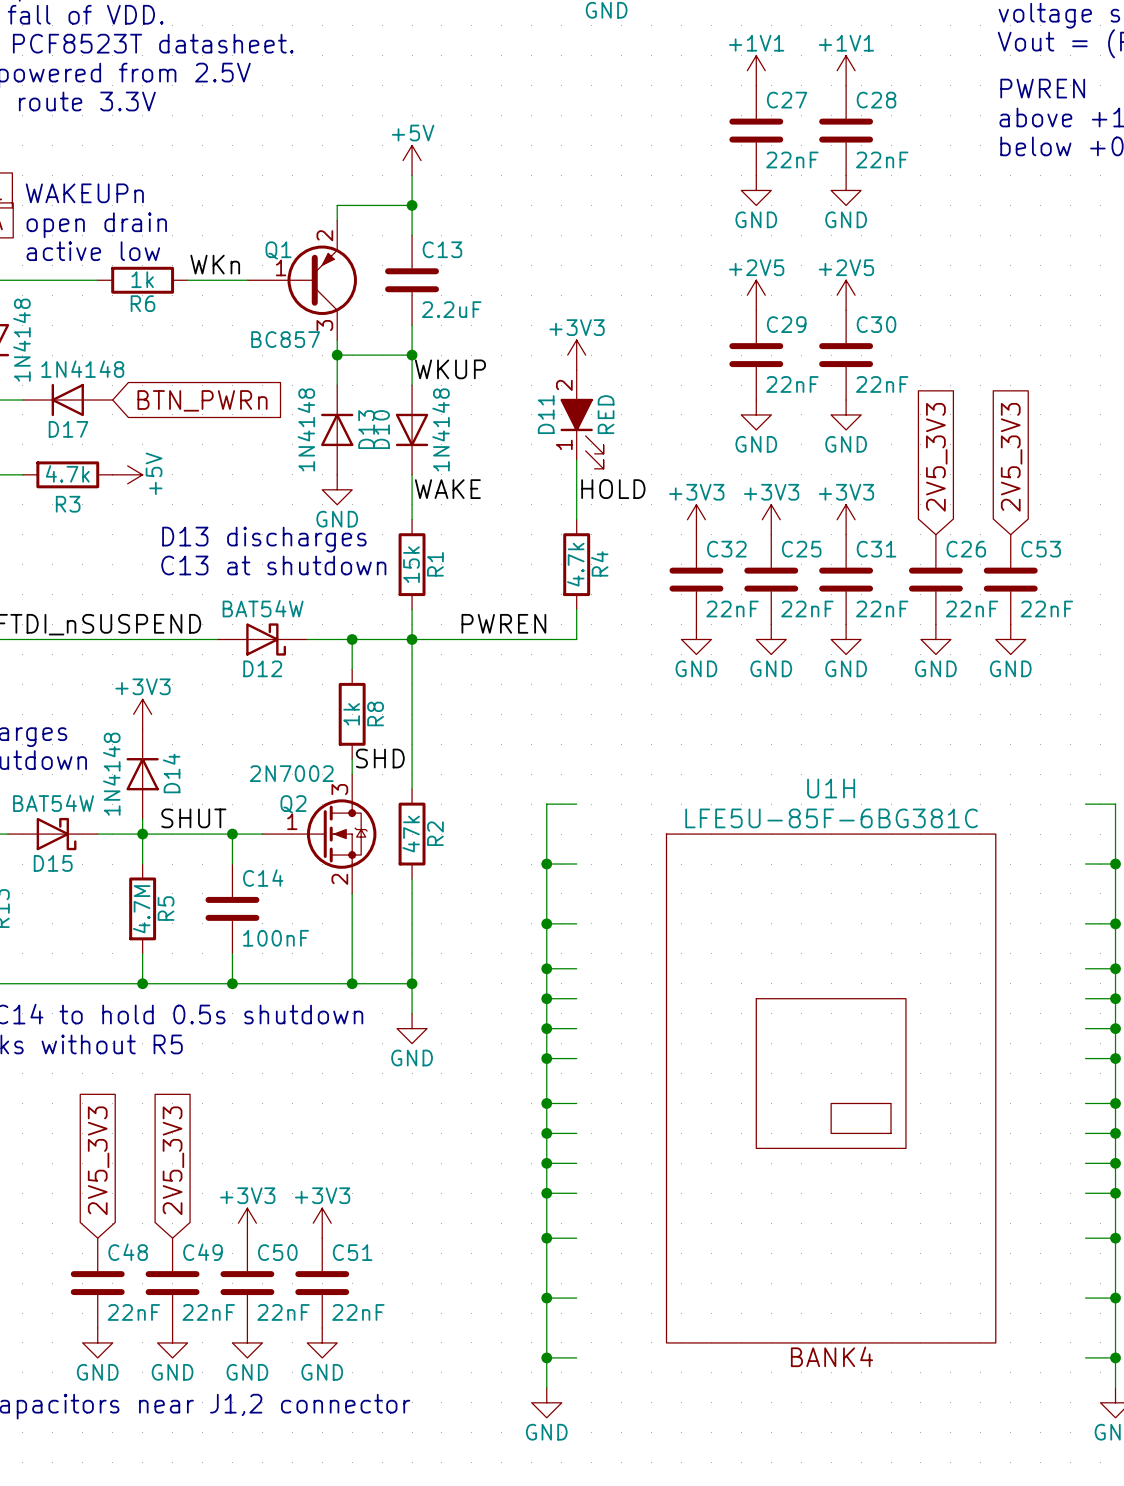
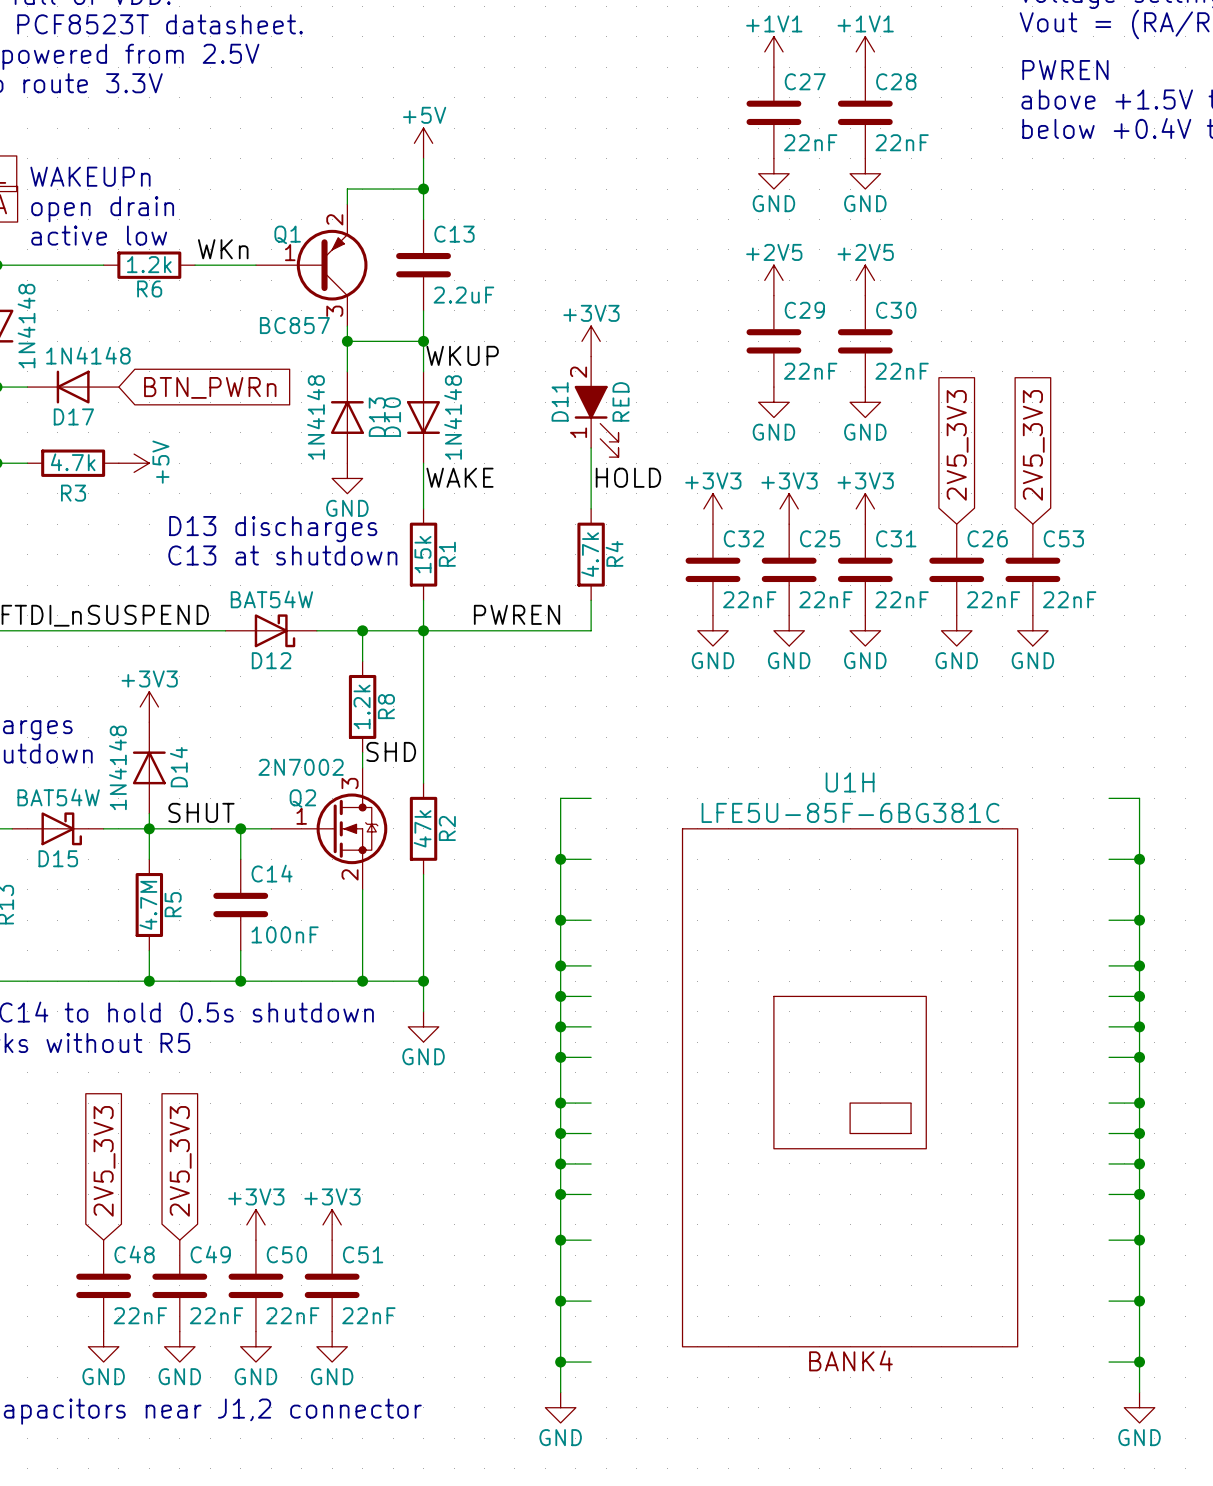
R6 value: 1k (142, 279) -> 1.2k (149, 264)
R8 value: 1k (351, 714) -> 1.2k (362, 706)

